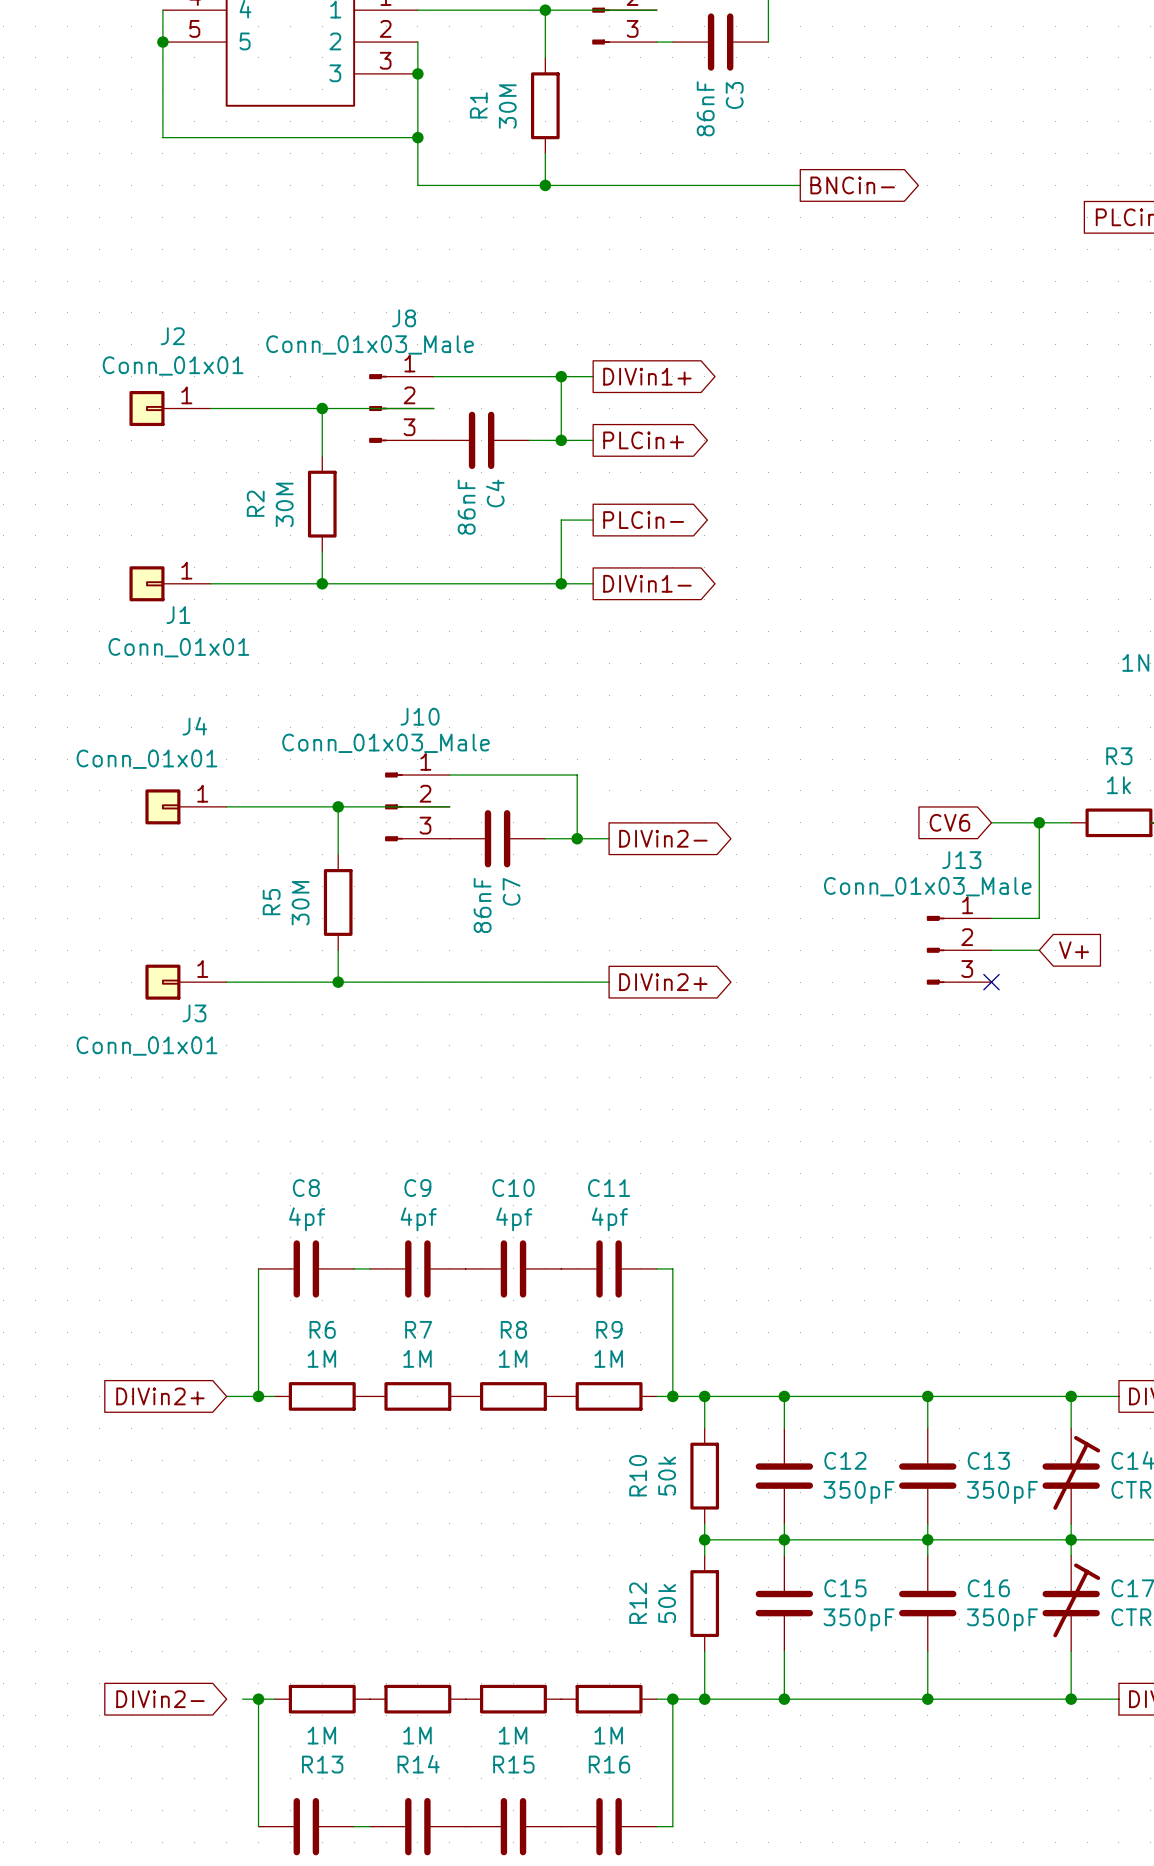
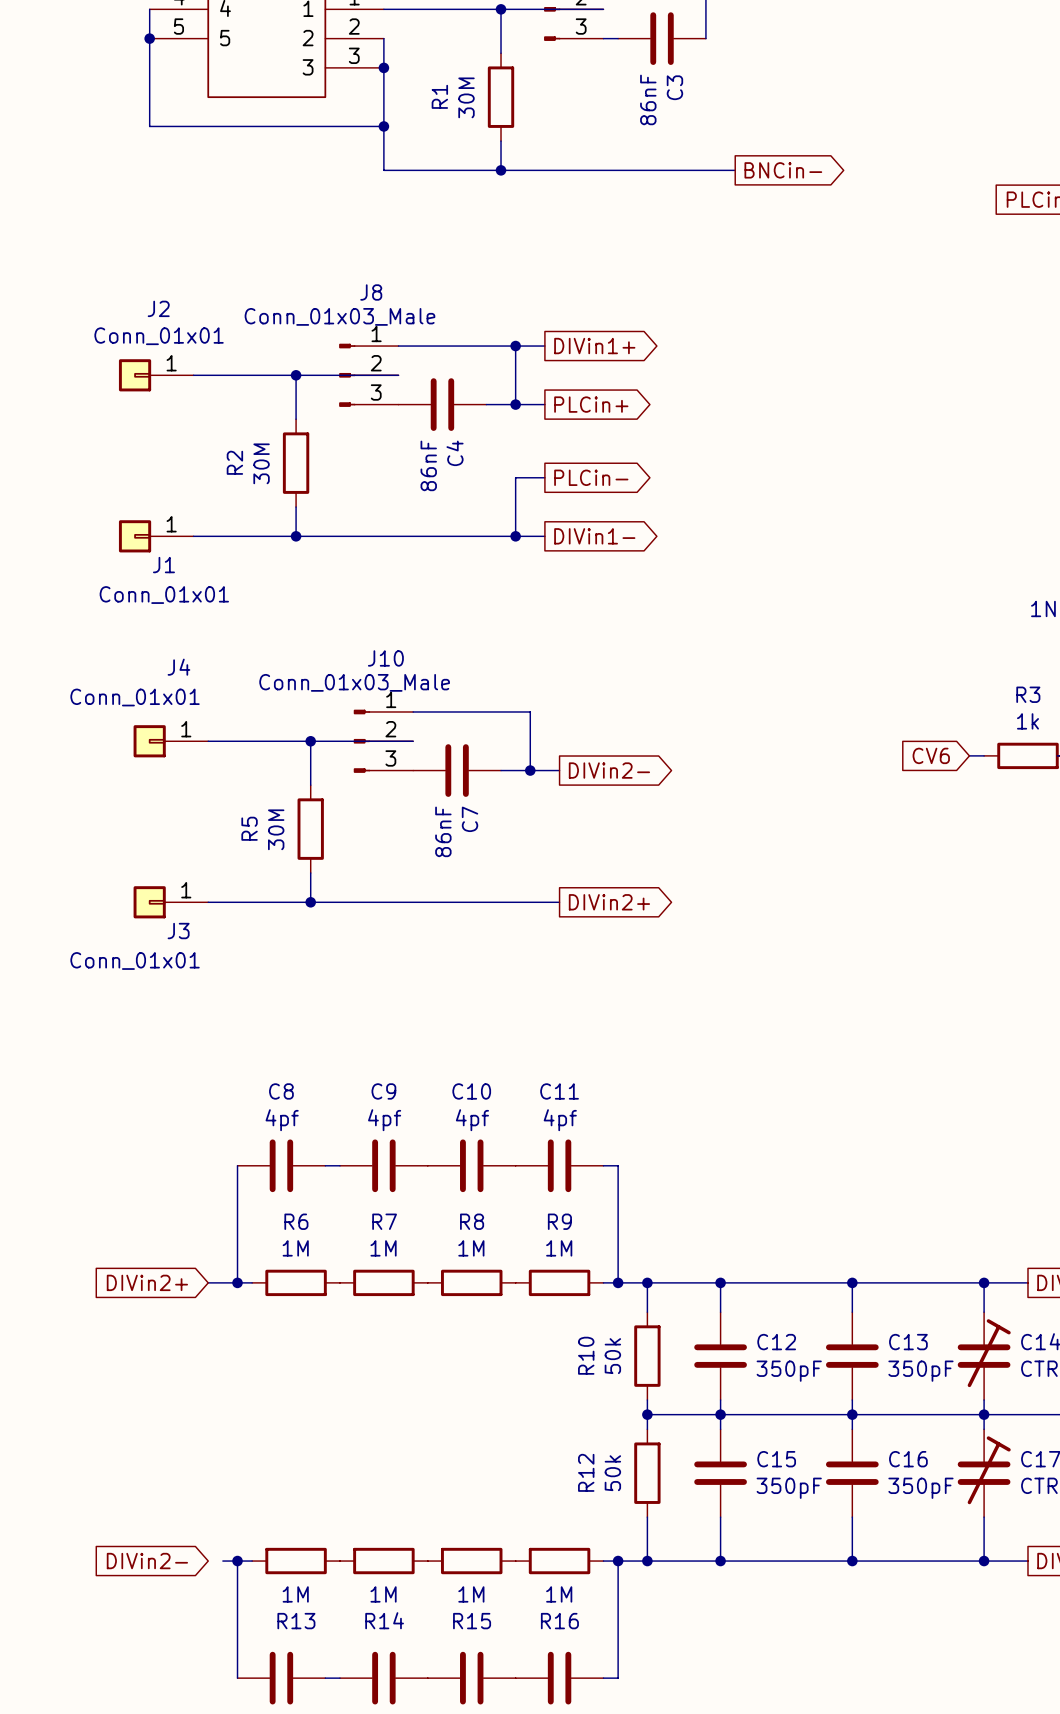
global label position: CV6 (949, 822) -> CV6 (931, 755)
wire: (991, 822) (1055, 822) -> none
wire: (1039, 822) (1039, 918) (991, 918) -> none
junction: (1039, 822) -> none
J13: Conn_01x03_Male (959, 950) -> none
wire: (991, 950) (1039, 950) -> none
global label: V+ (1074, 950) -> none
no-connect mark: (991, 982) -> none

